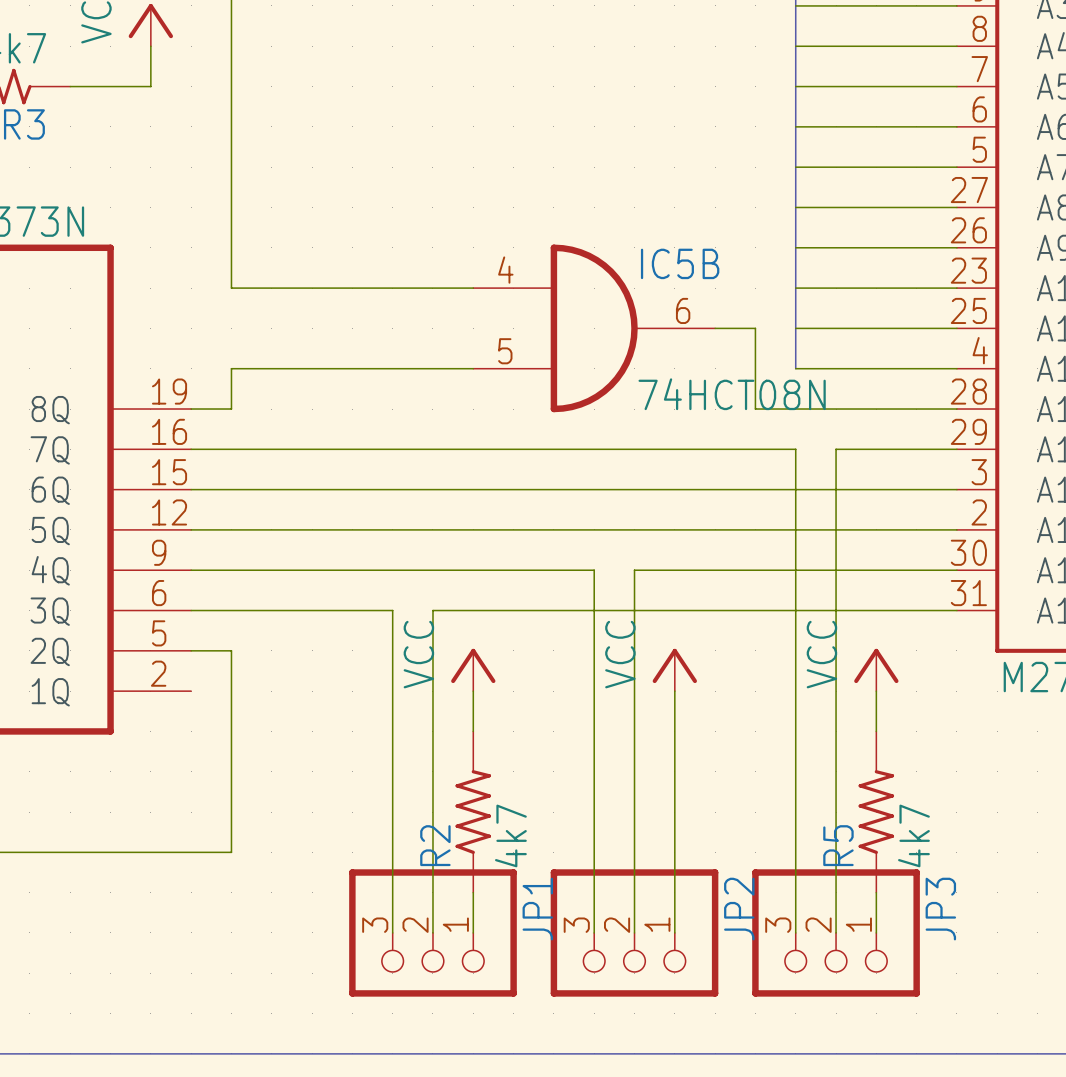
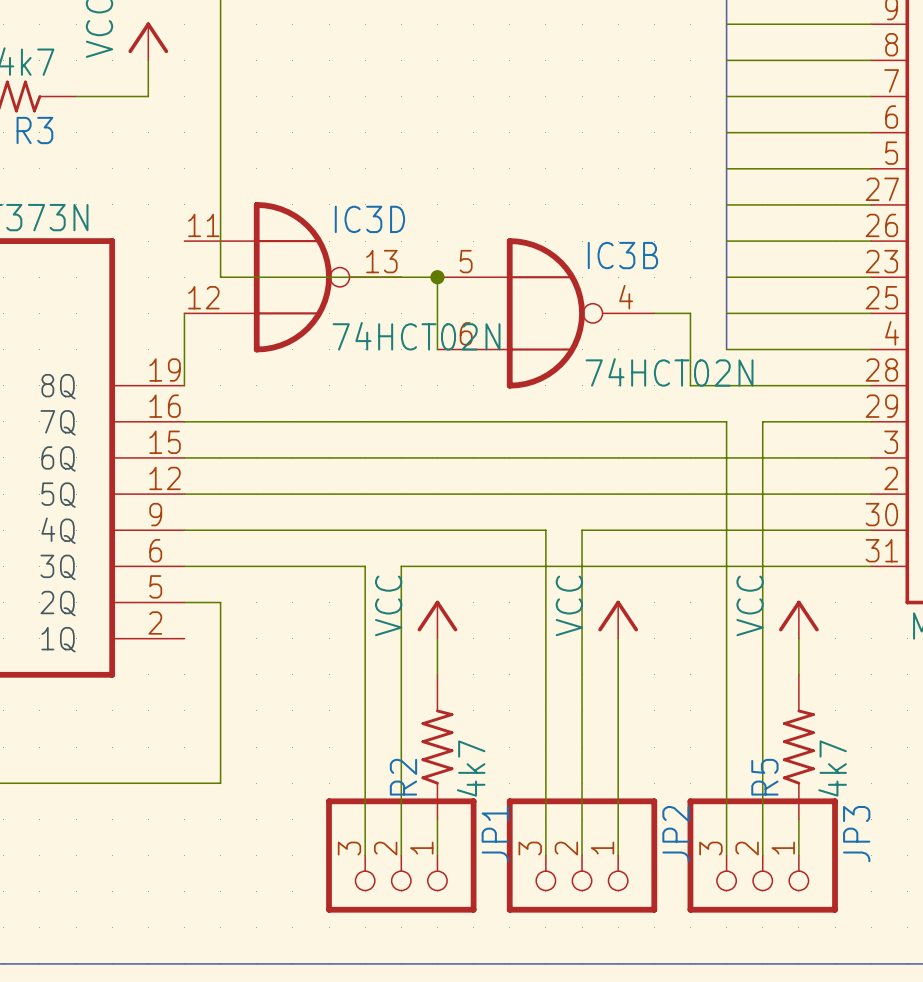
IC3D: none -> 74HCT02N (292, 277)
wire: none -> (437, 277) (437, 349)
junction: none -> (437, 277)
IC5B: 74HCT08N (594, 328) -> none
IC3B: none -> 74HCT02N (545, 313)
wire: (473, 368) (231, 368) (231, 409) (191, 409) -> (184, 313) (184, 385)

